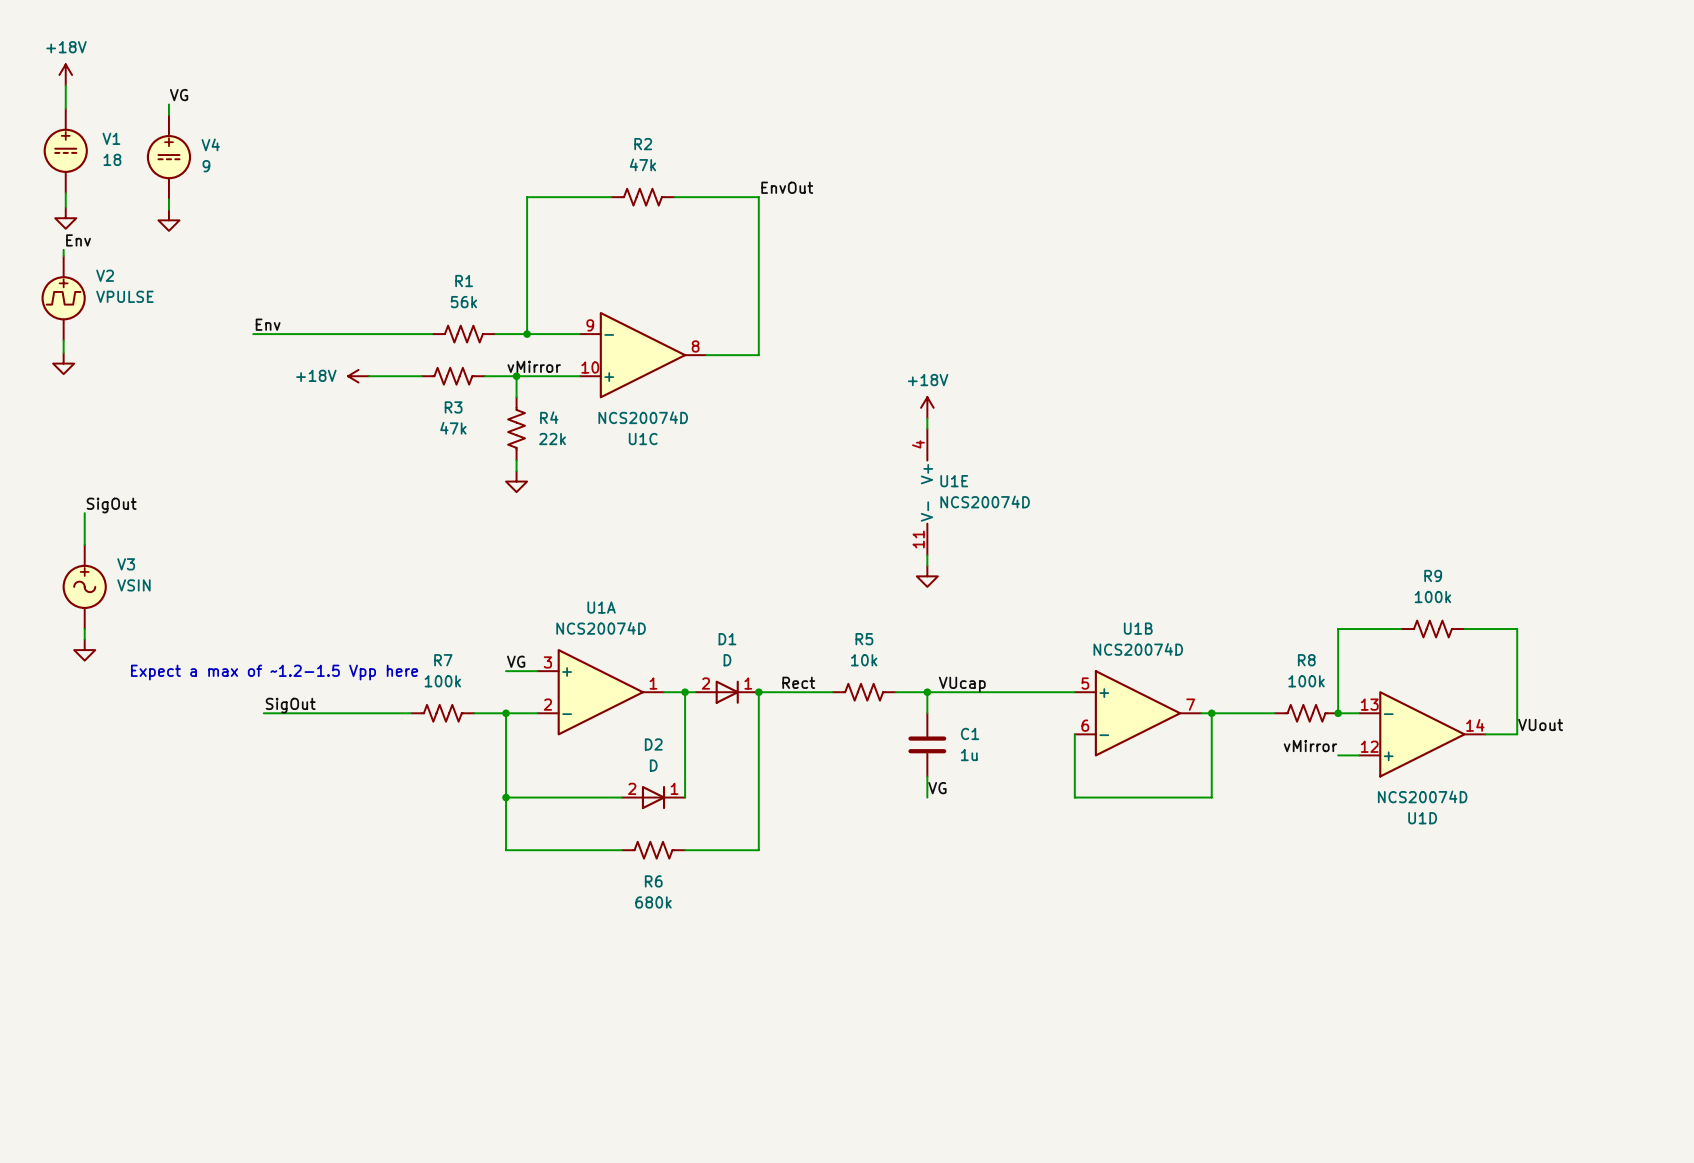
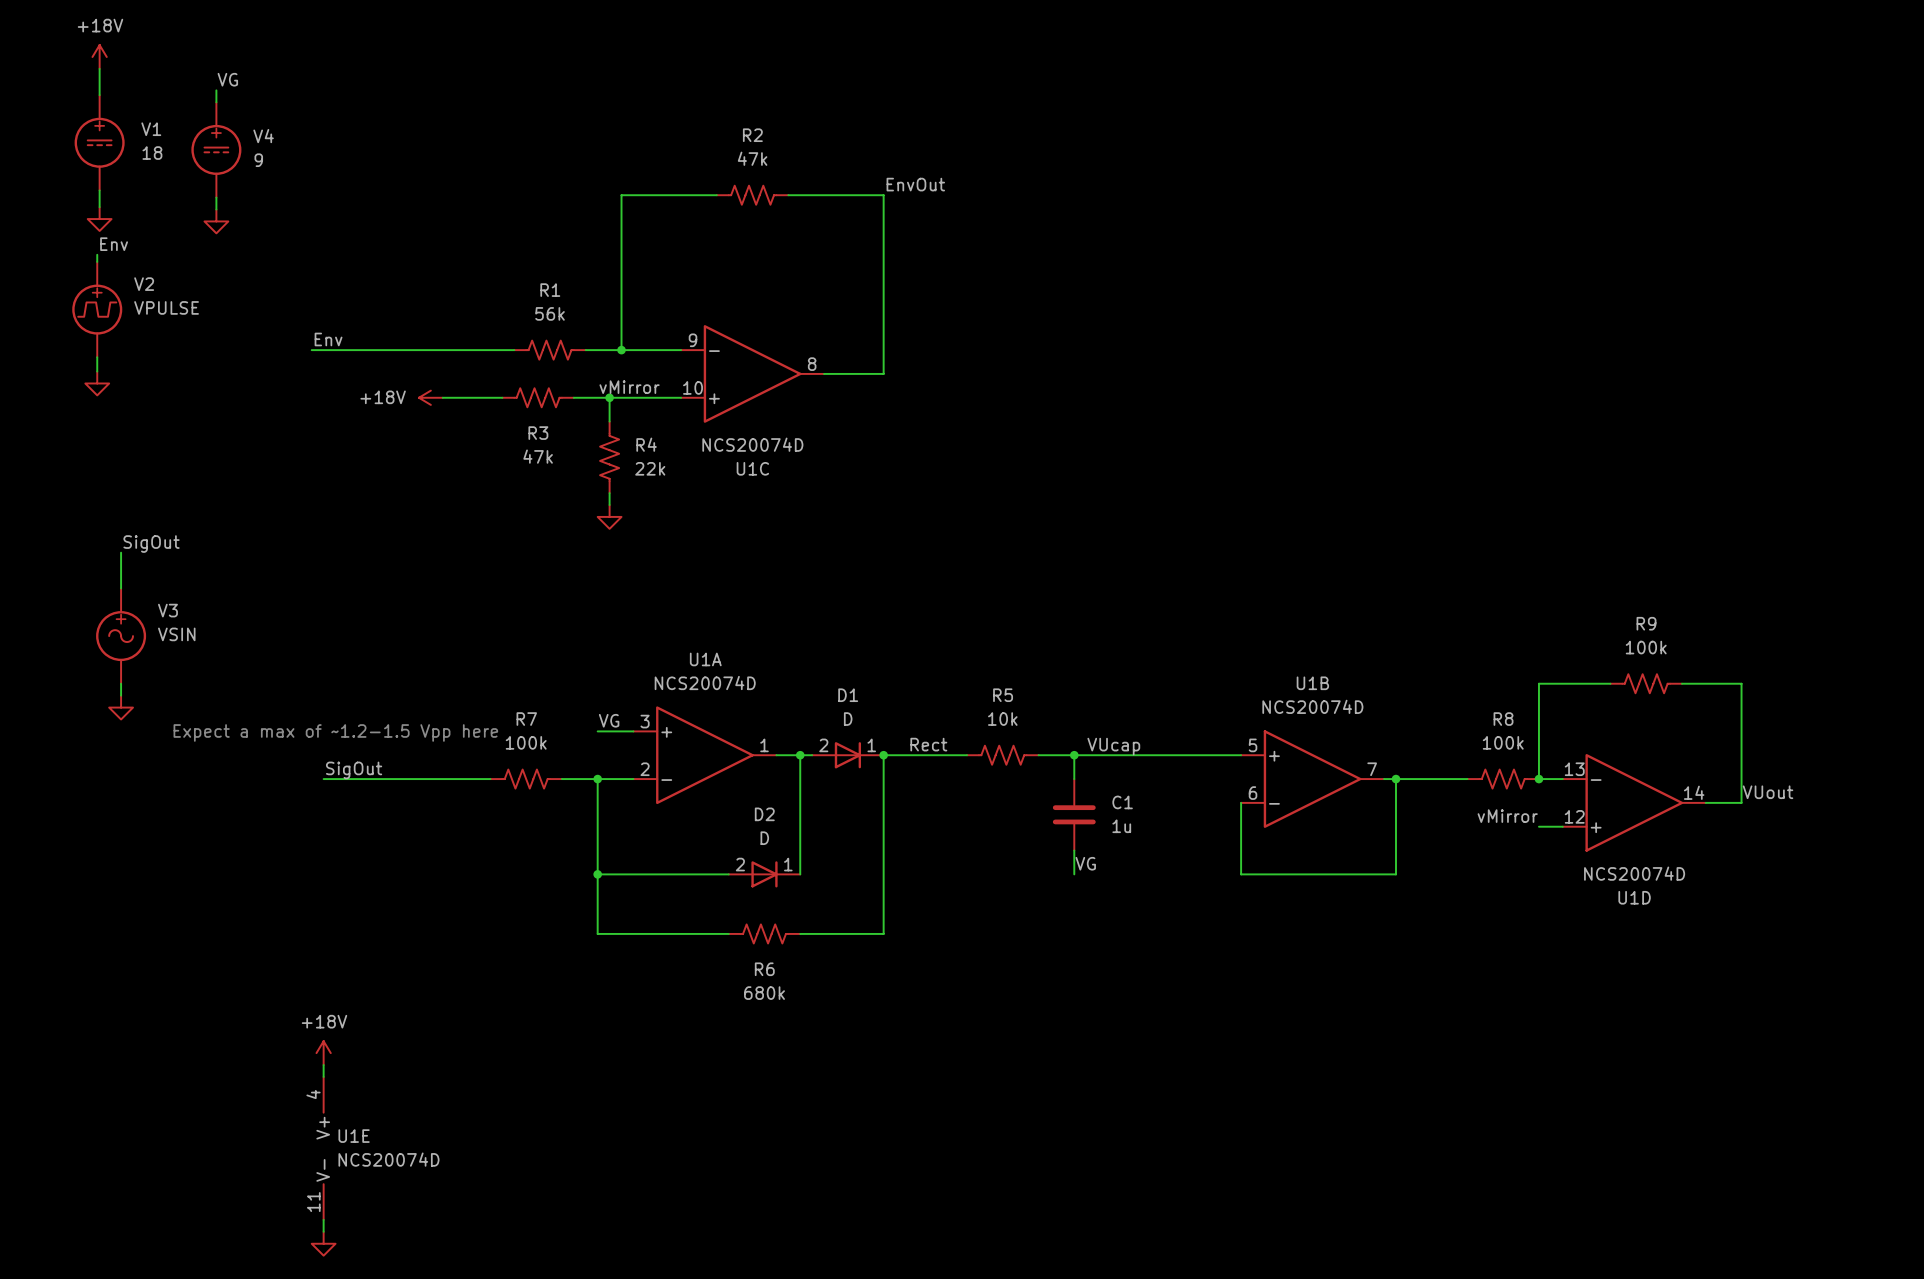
power symbol: +18V (927, 407) -> none
wire: (927, 418) (927, 428) -> none
U1E position: (927, 492) -> (323, 1148)
wire: (927, 555) (927, 565) -> none
power symbol: (927, 576) -> none
power symbol: none -> +18V (323, 1053)
wire: none -> (323, 1065) (323, 1076)
wire: none -> (323, 1219) (323, 1231)
power symbol: none -> (323, 1243)

